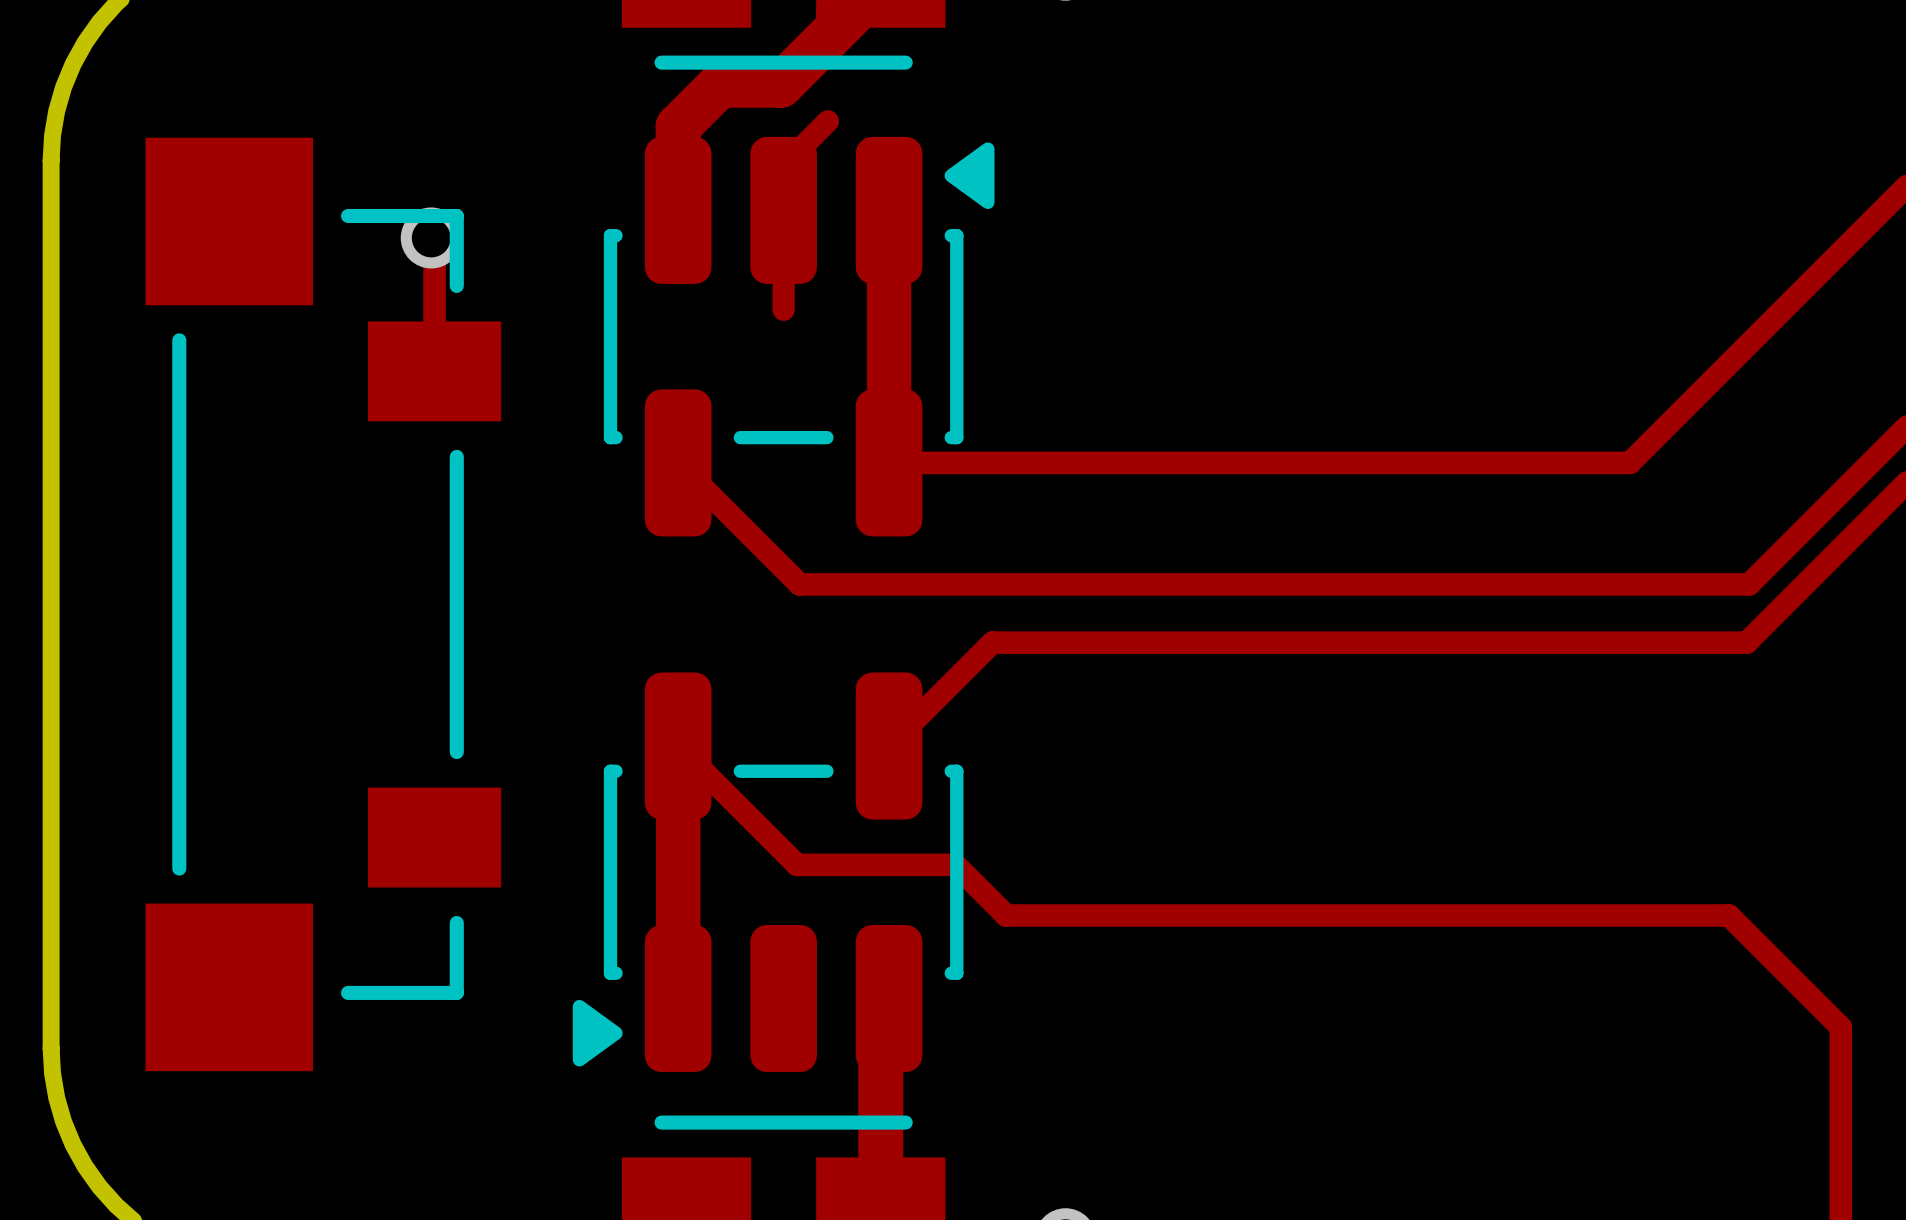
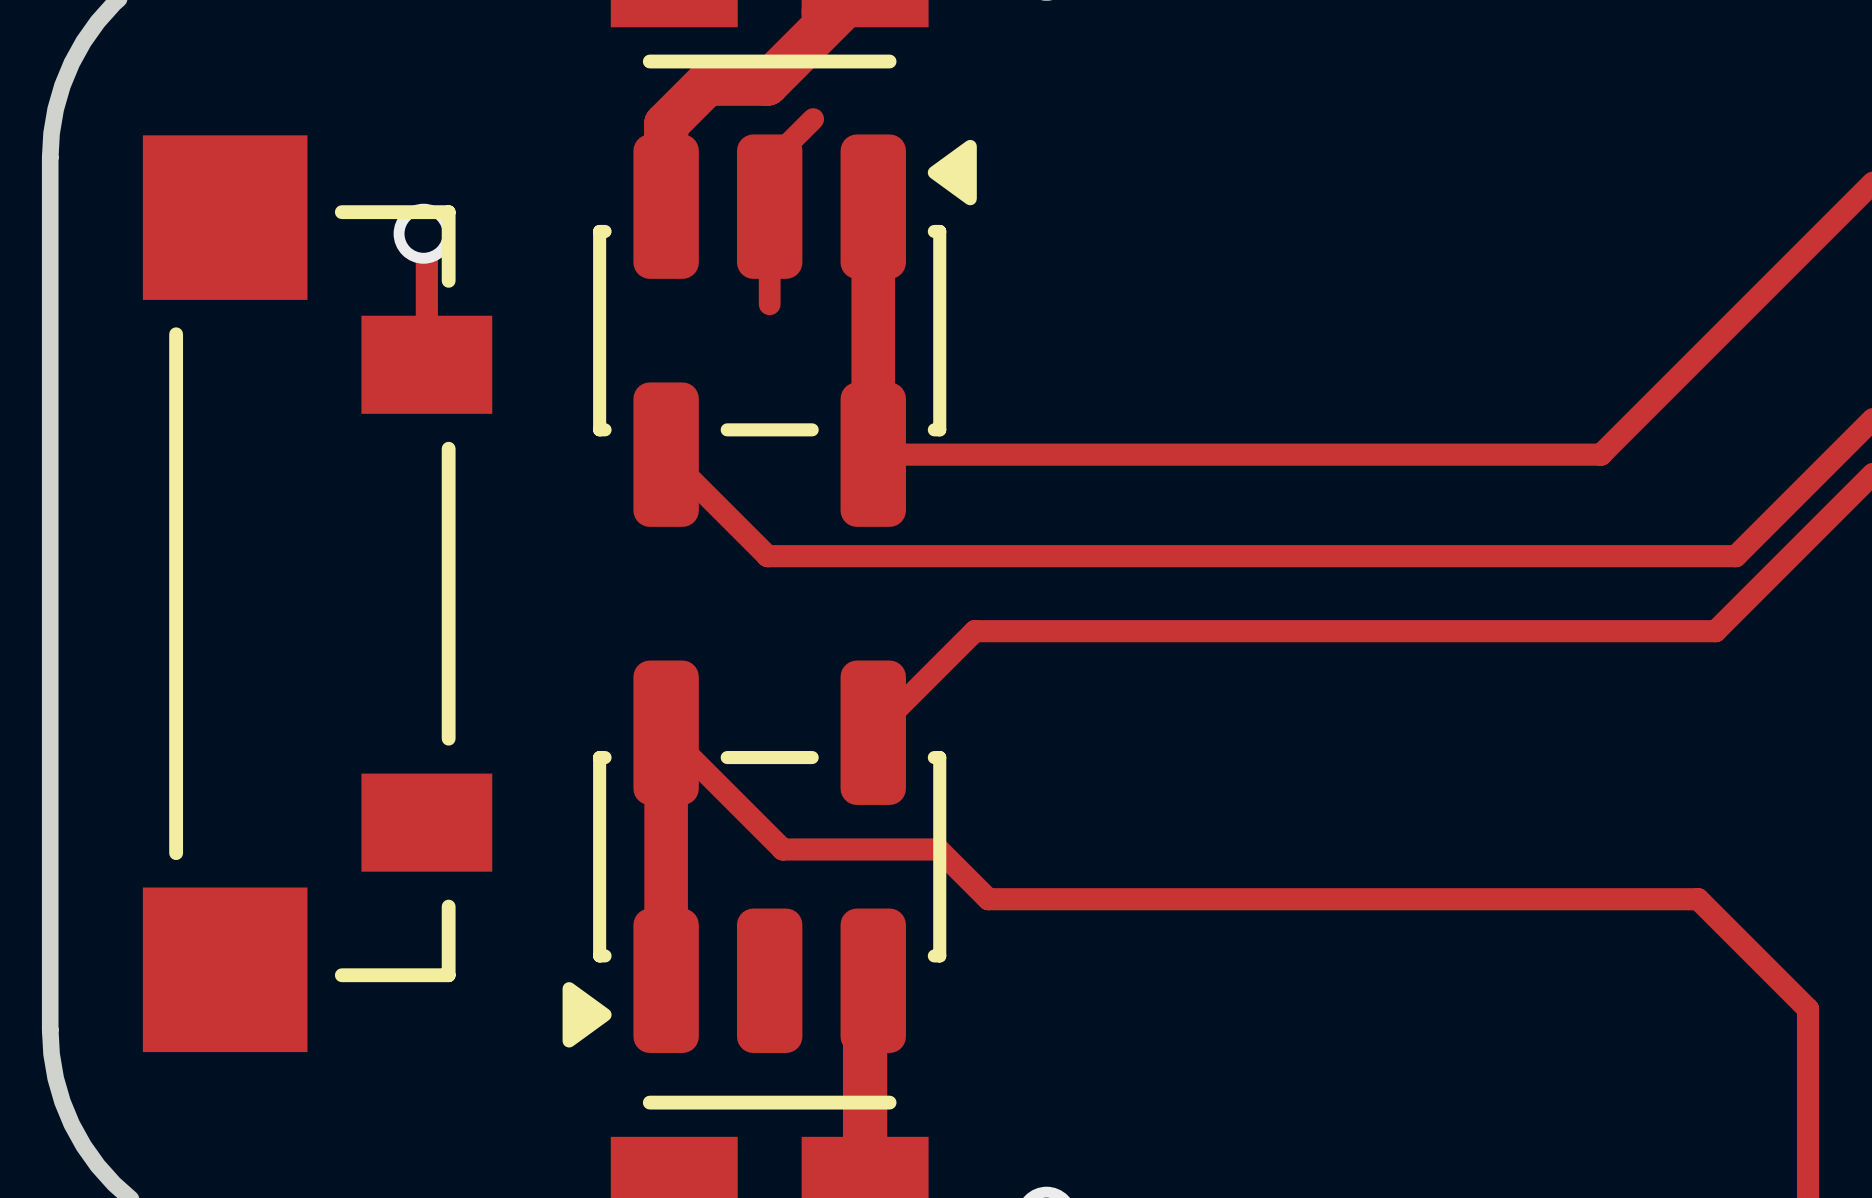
track: (781, 566) (799, 584) (1749, 584) (1767, 566) -> (767, 556) (1735, 556)

